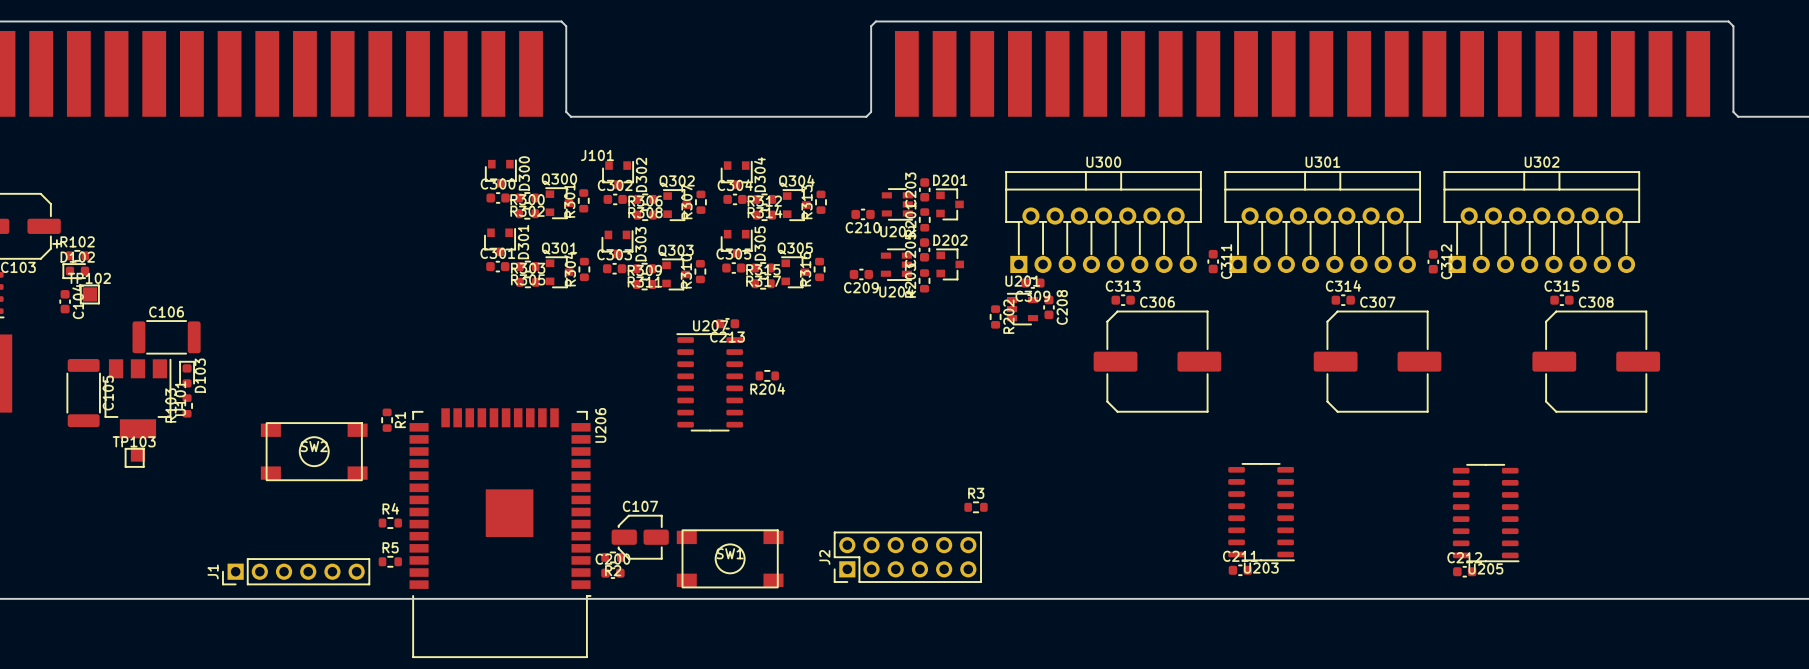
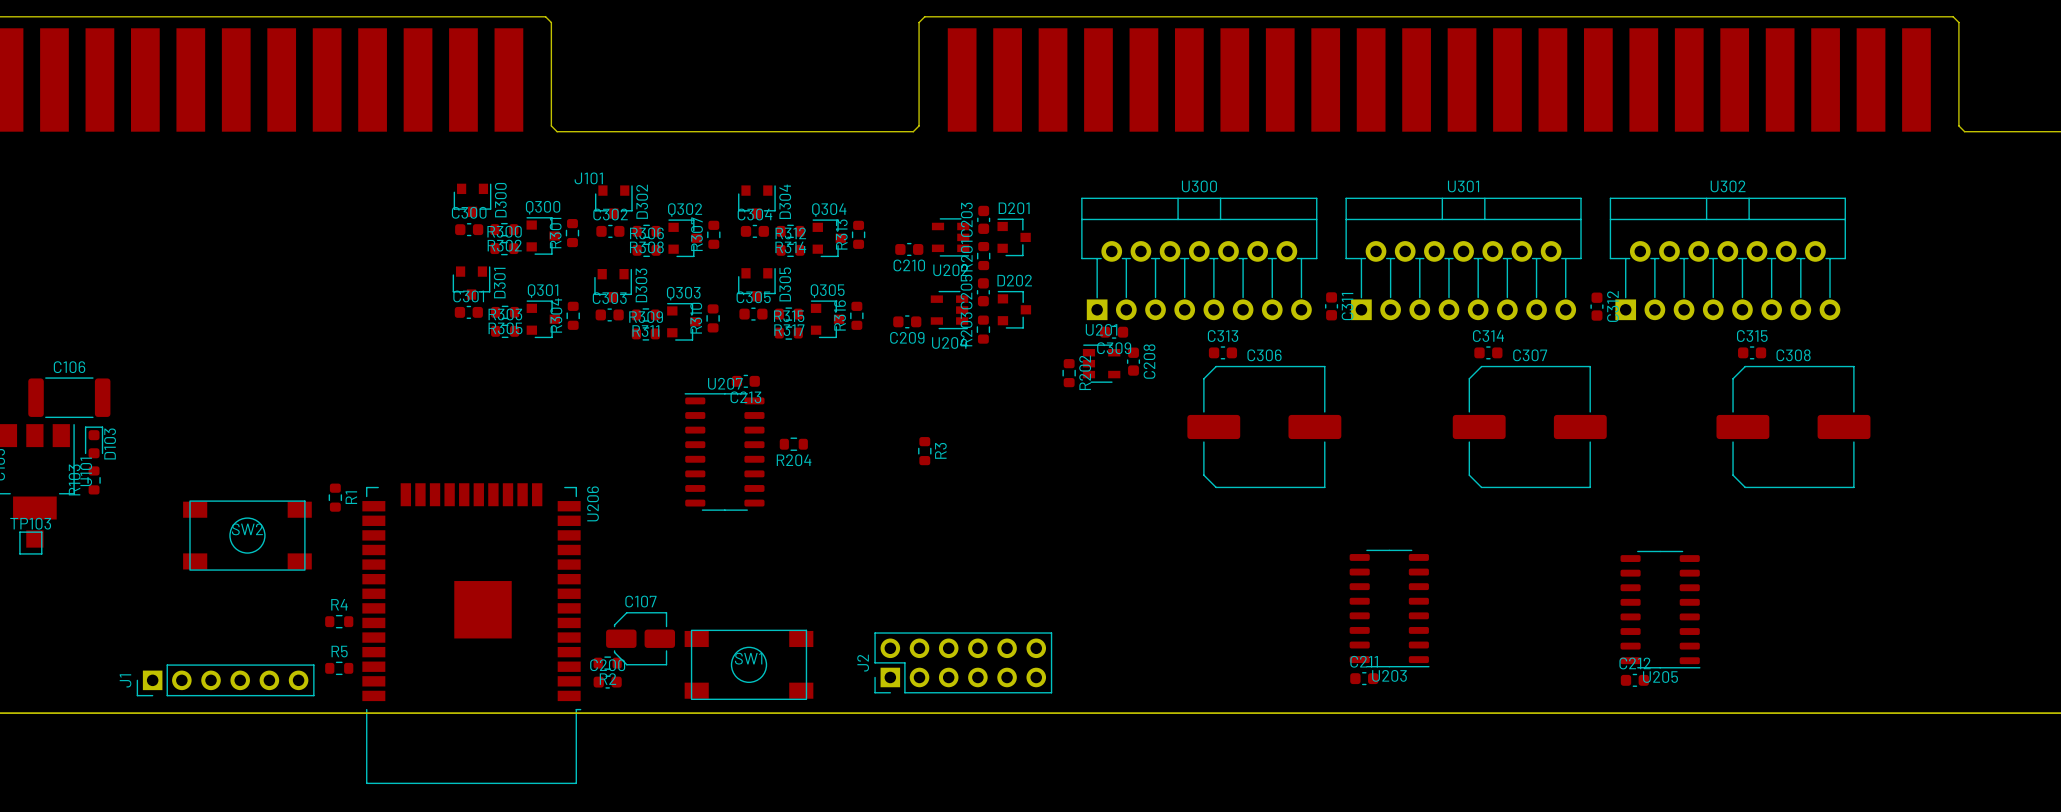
R3 rotation: 0° (976, 507) -> 90° clockwise (924, 451)
R3 position: (976, 507) -> (924, 451)

